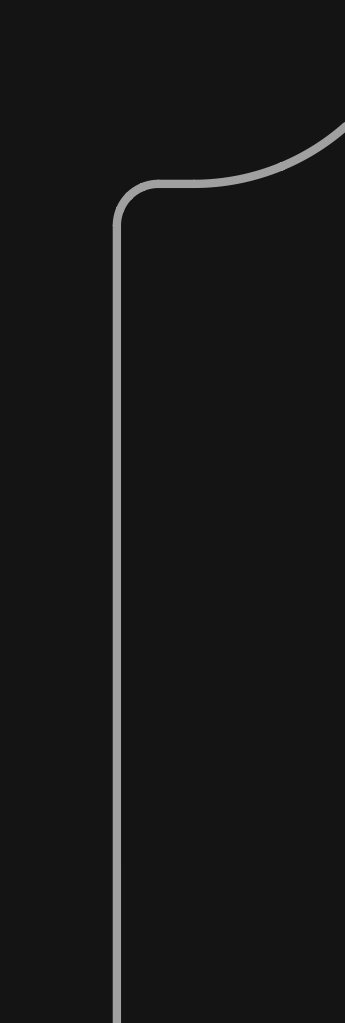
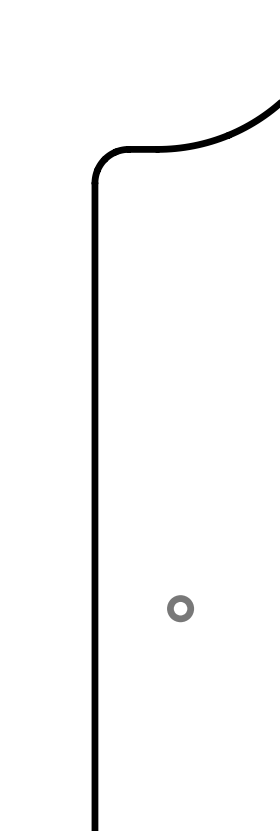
via: none -> (180, 608)

